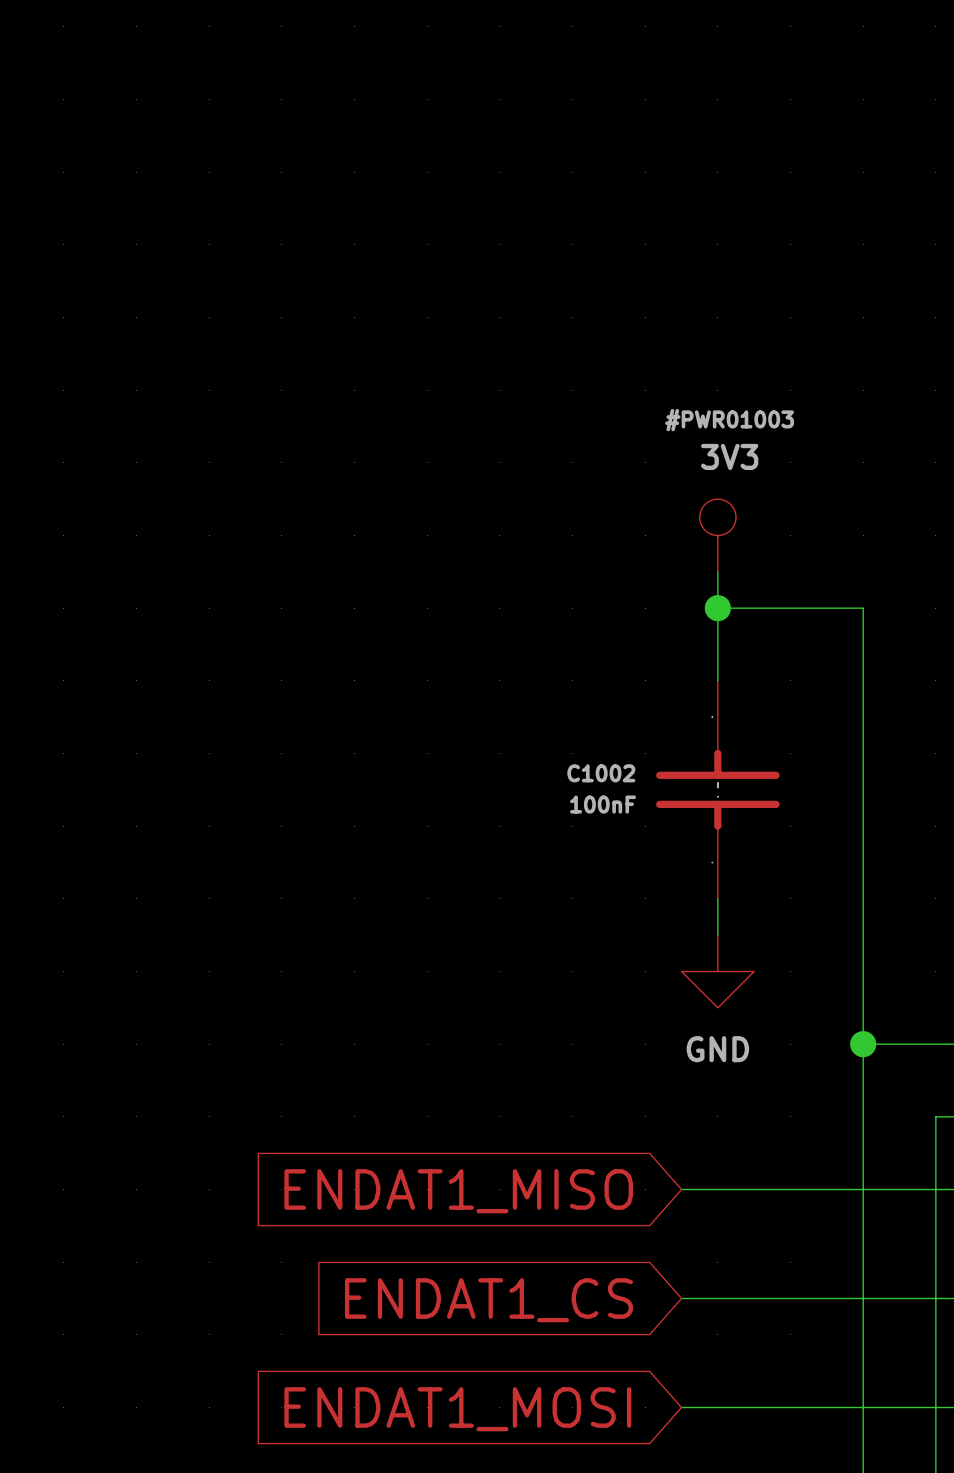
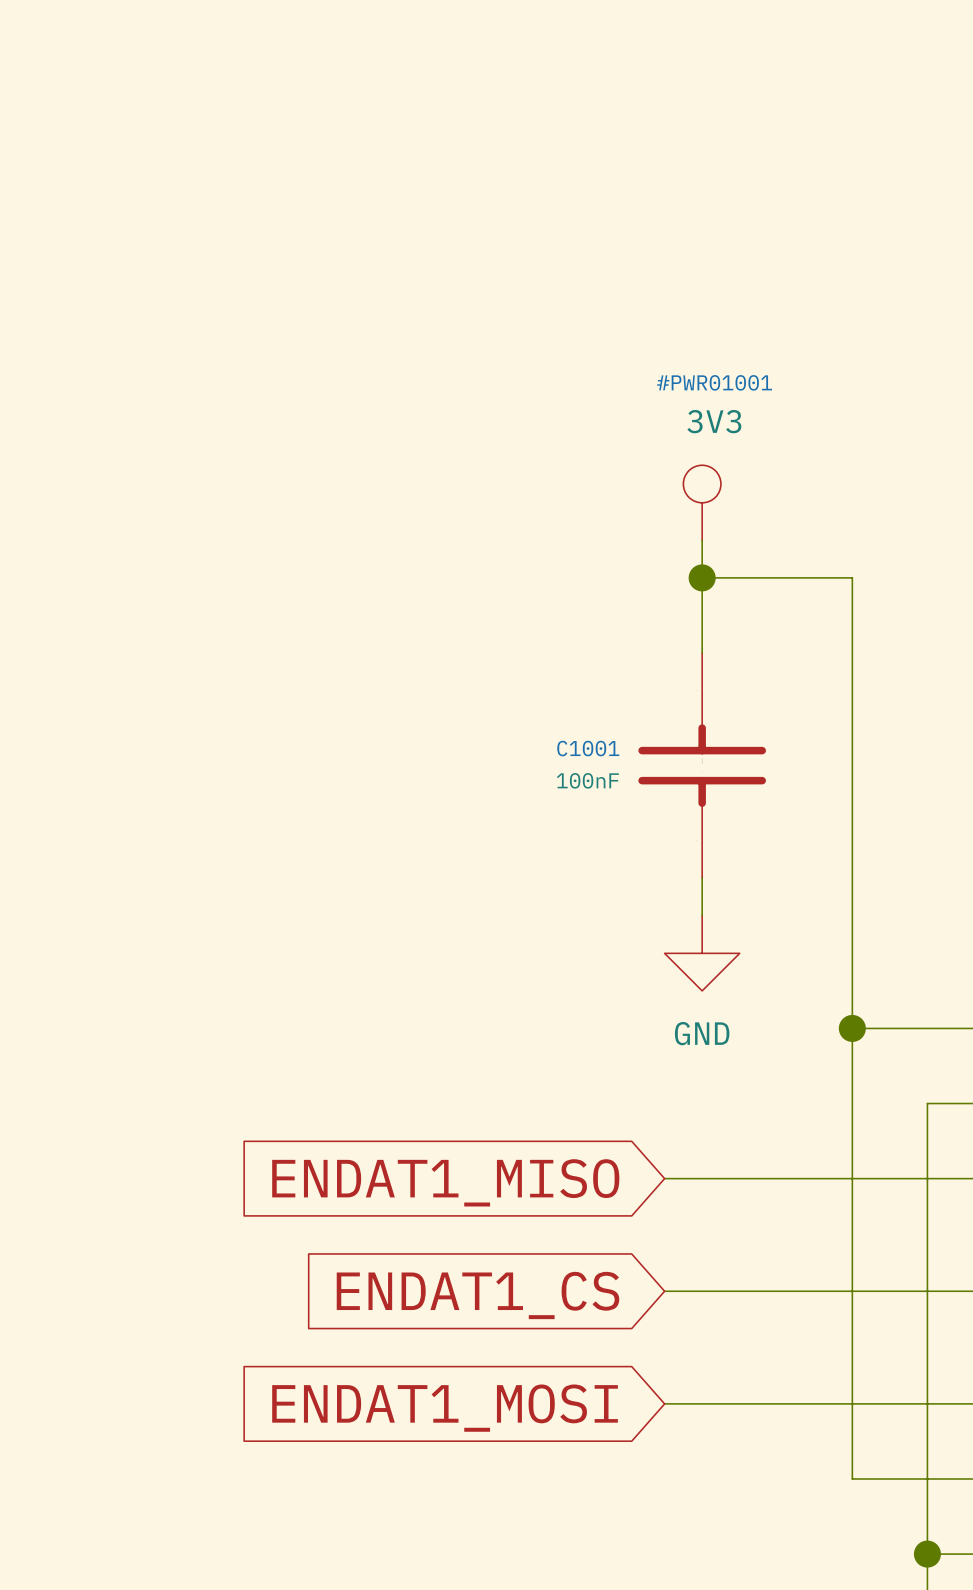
#PWR01003 name: #PWR01003 (729, 420) -> #PWR01001 (714, 382)
C1002 name: C1002 (601, 773) -> C1001 (588, 748)

